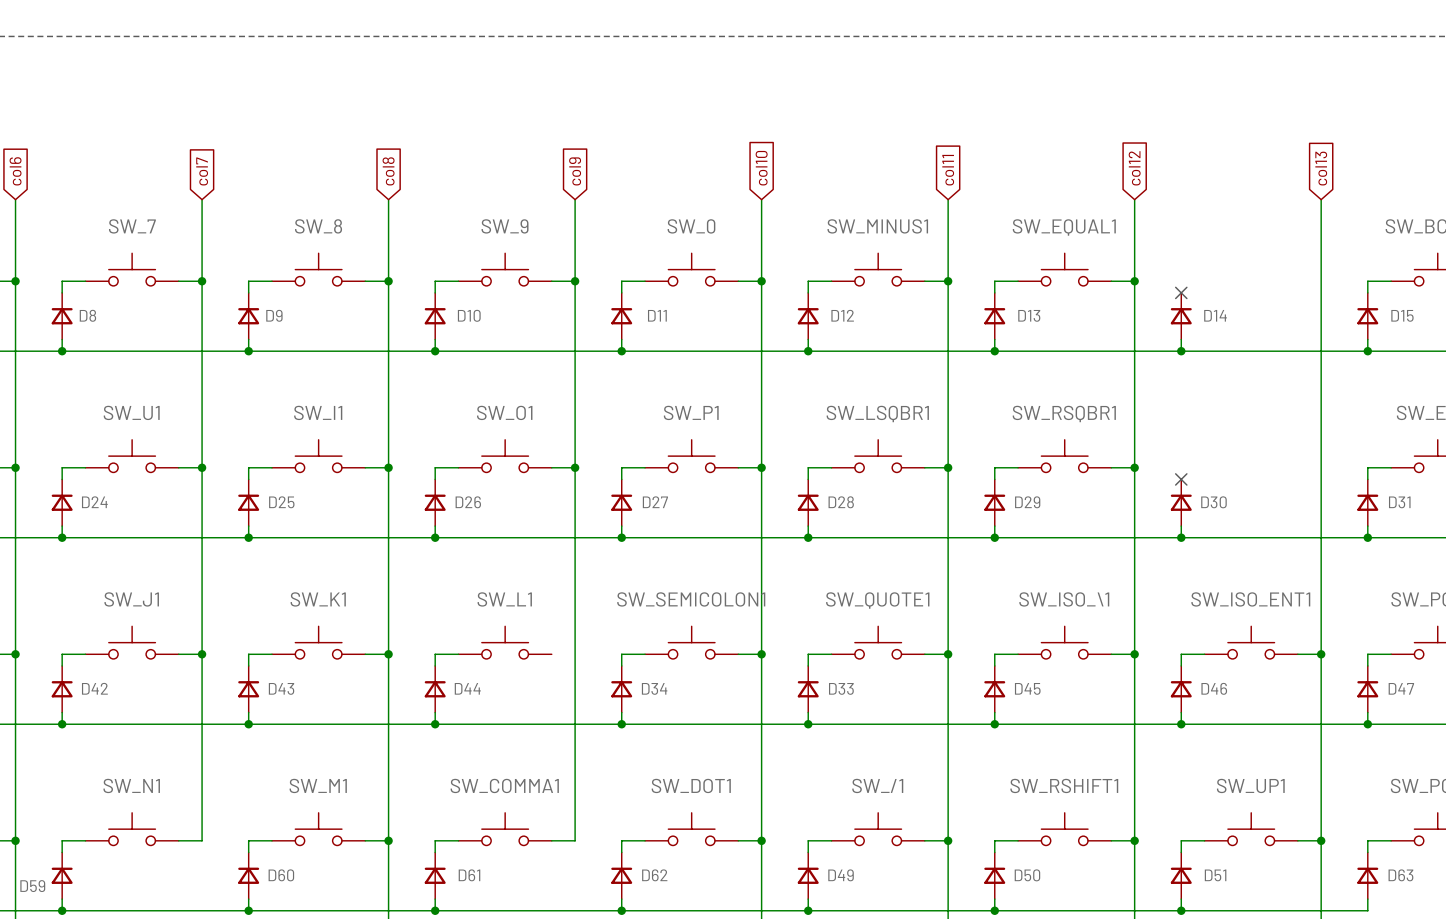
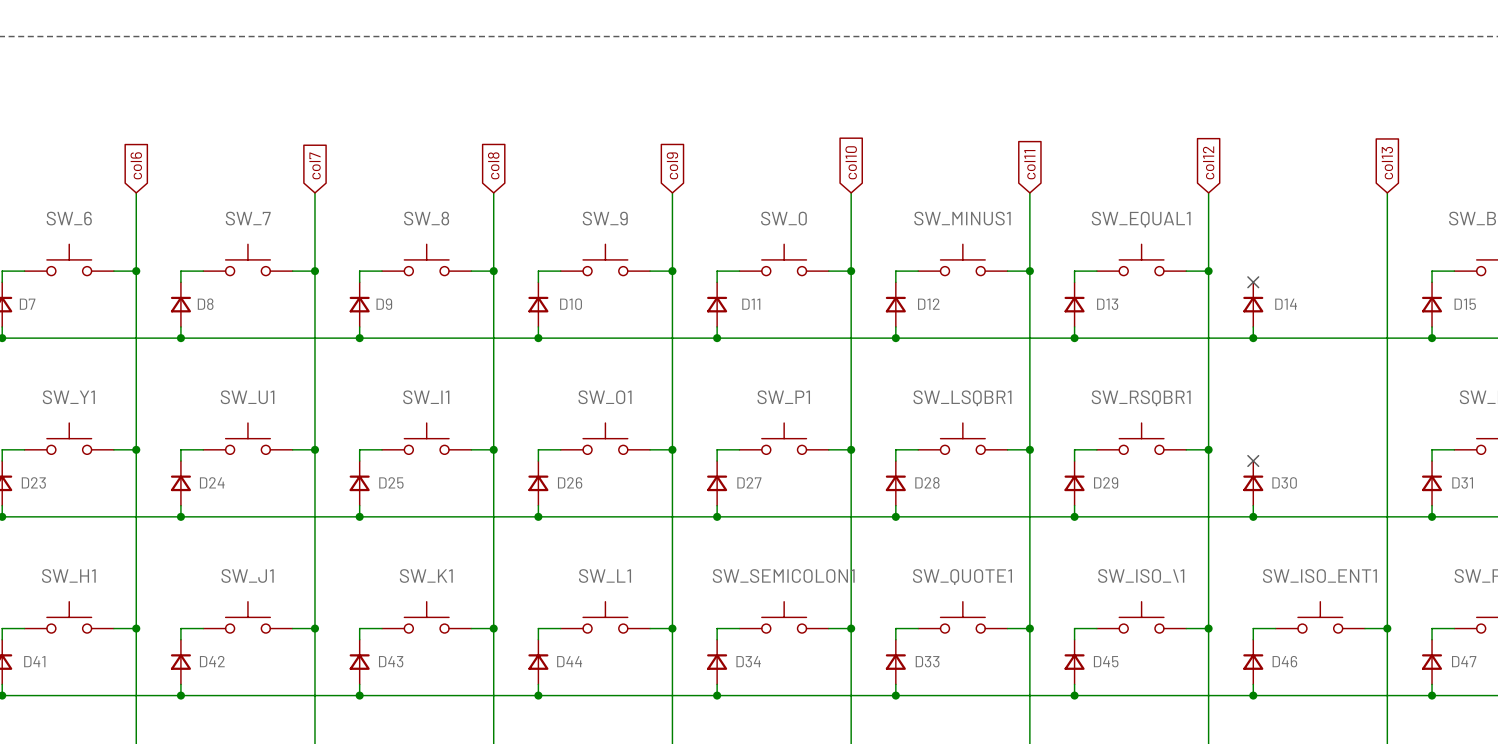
wire: none -> (650, 628) (672, 628)
junction: none -> (672, 628)

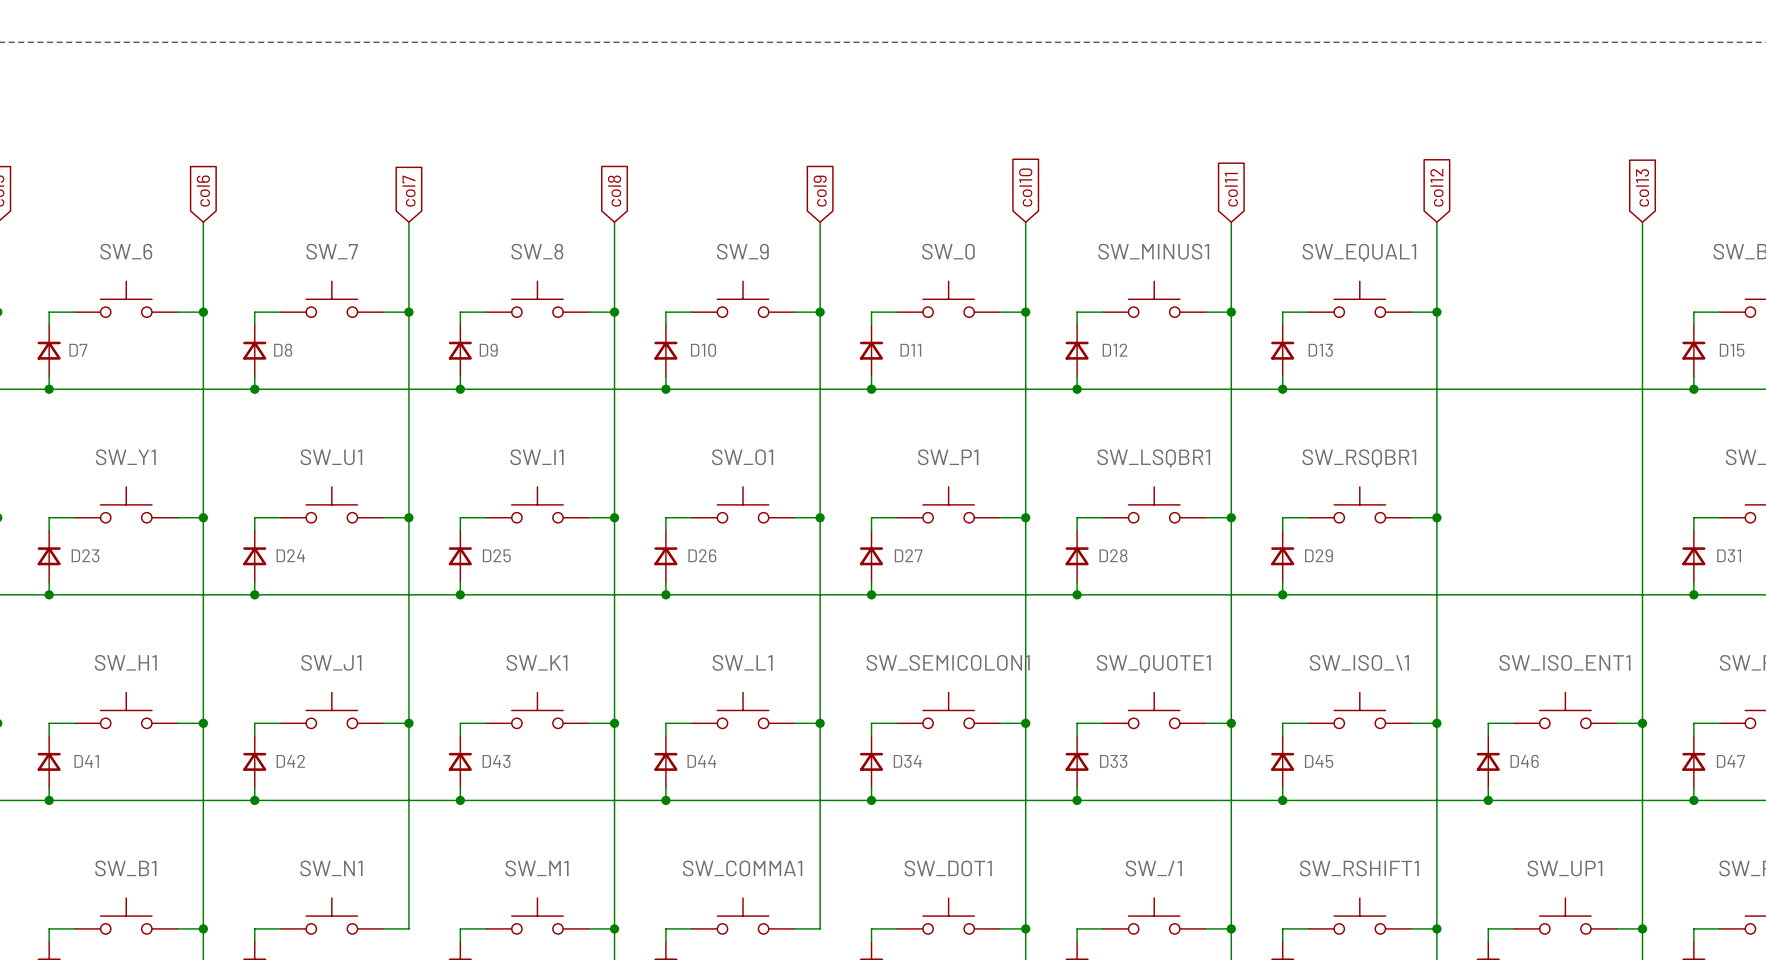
no-connect mark: (1253, 282) -> none
D14: (1253, 304) -> none
wire: (1253, 326) (1253, 338) -> none
junction: (1253, 338) -> none
no-connect mark: (1253, 461) -> none
D30: (1253, 483) -> none
wire: (1253, 505) (1253, 516) -> none
junction: (1253, 516) -> none

